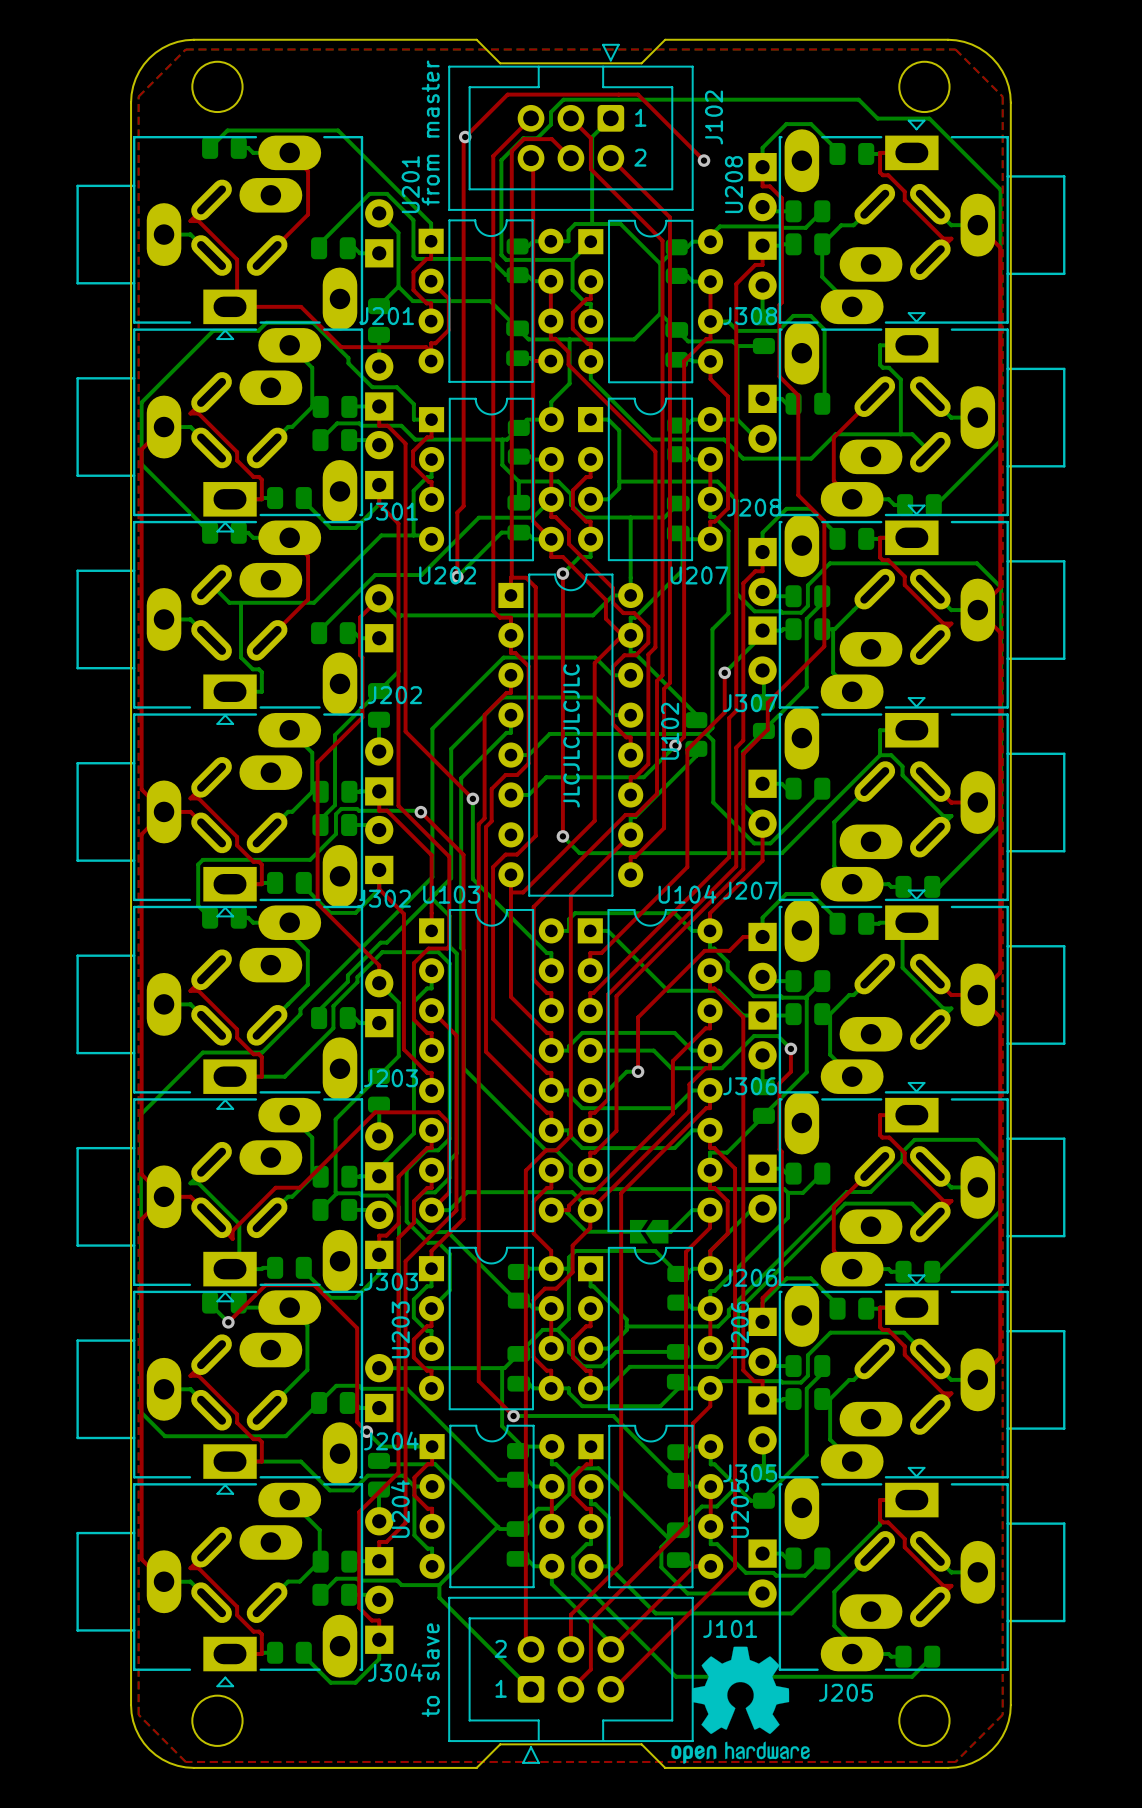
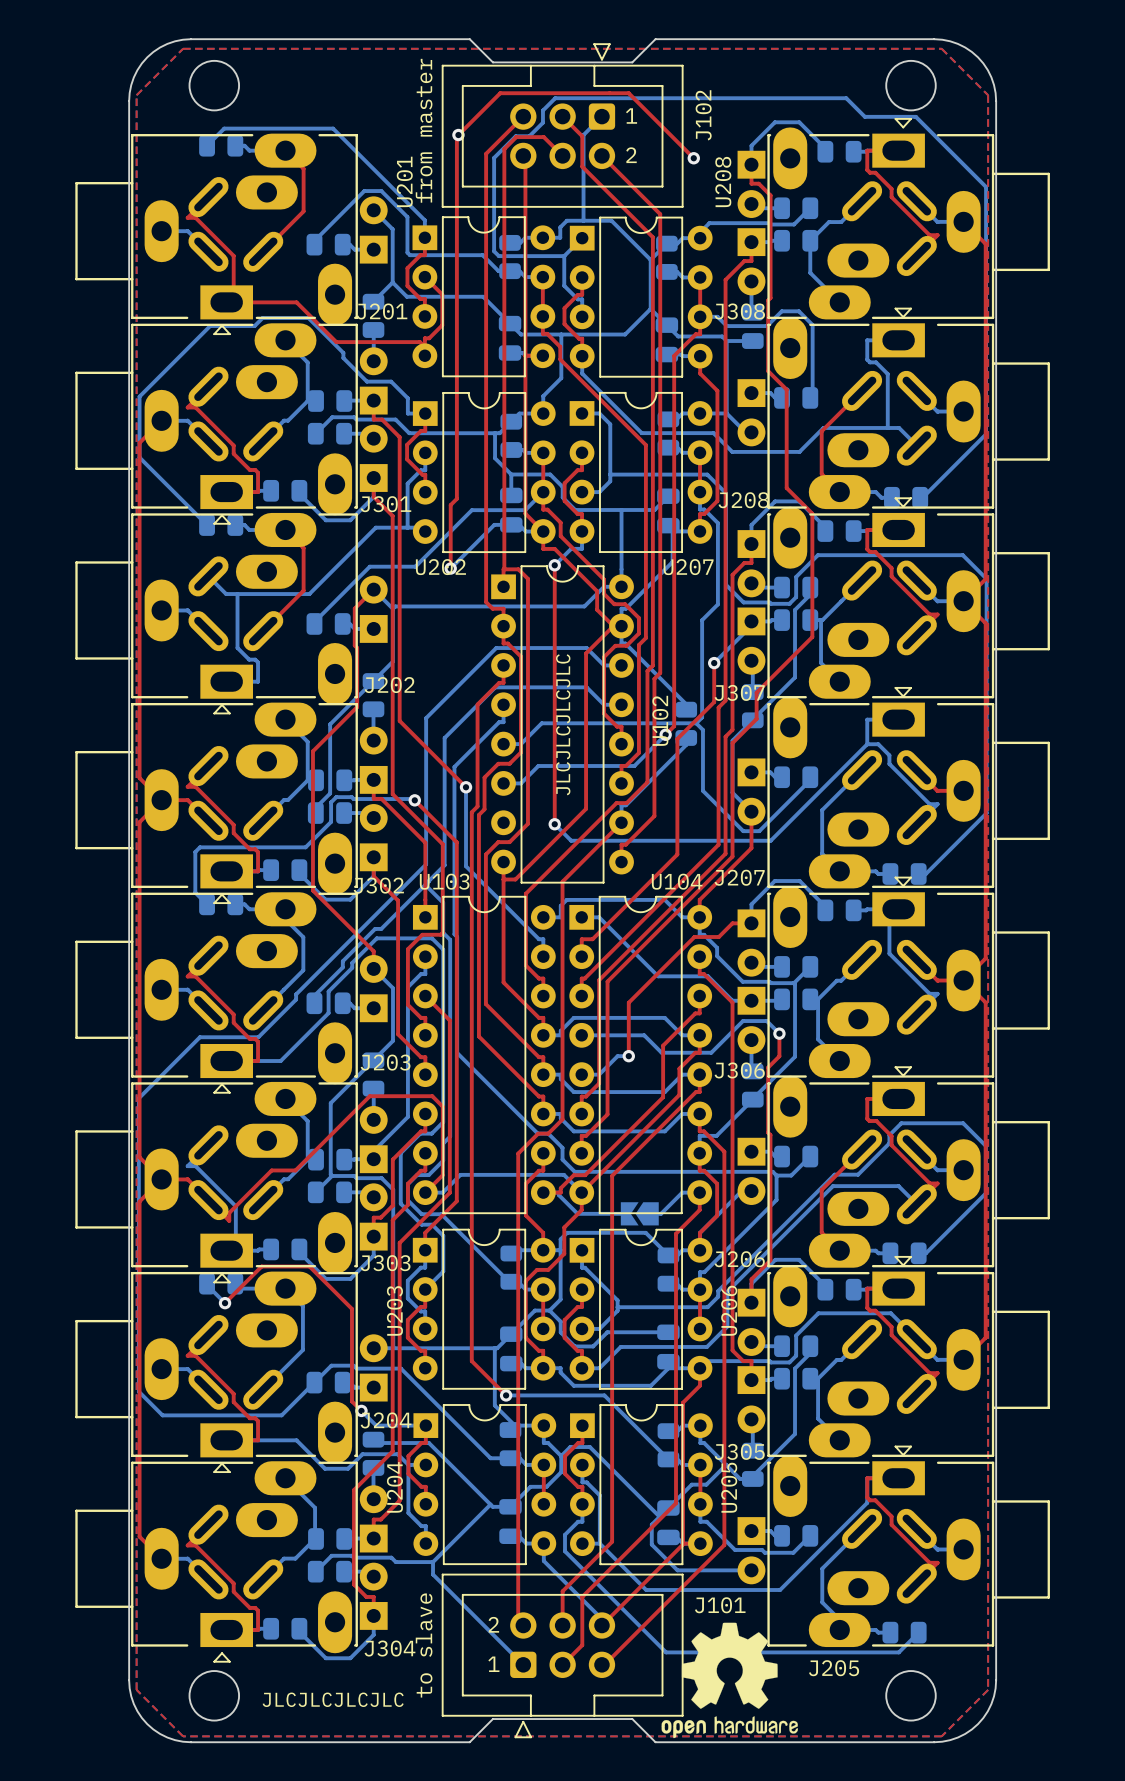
text: none -> JLCJLCJLCJLC (333, 1699)

